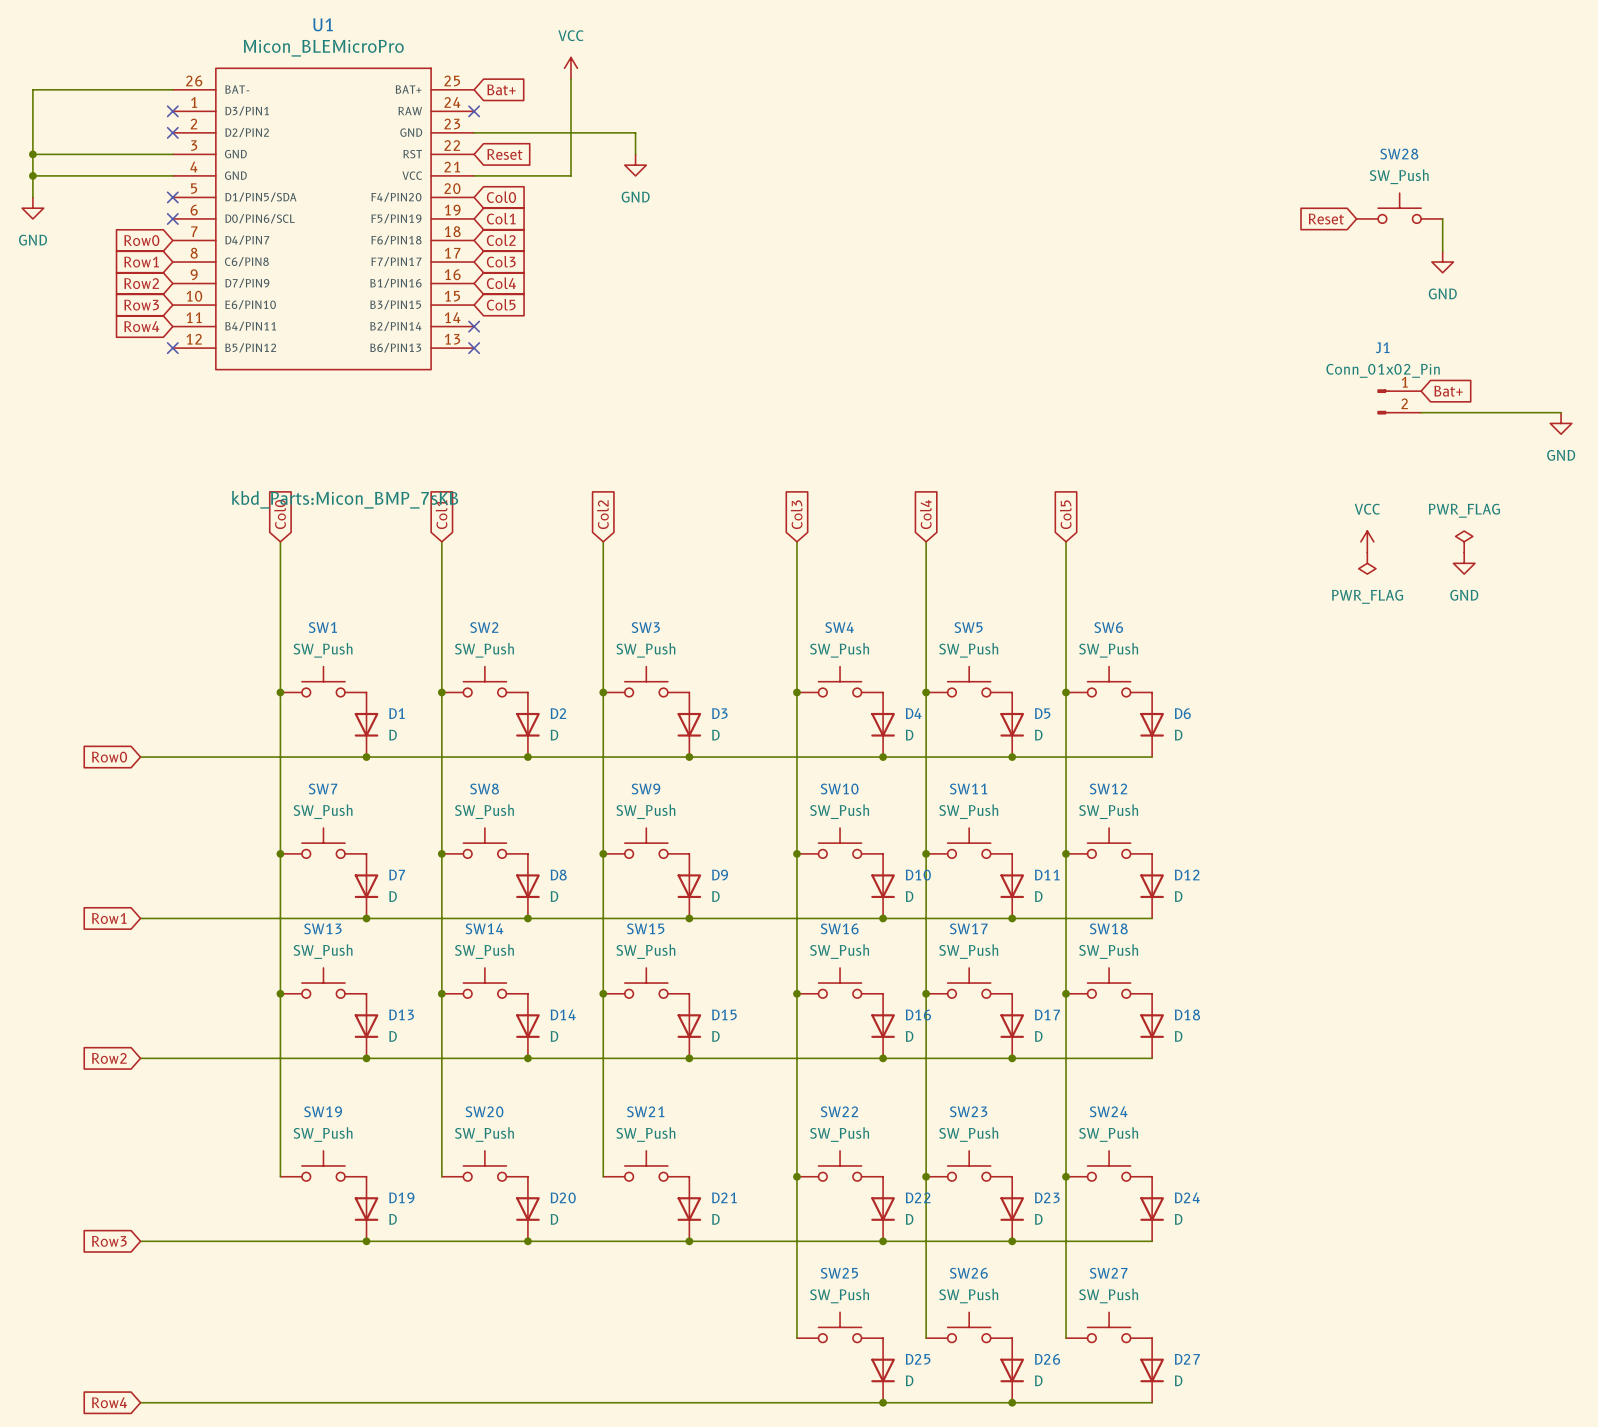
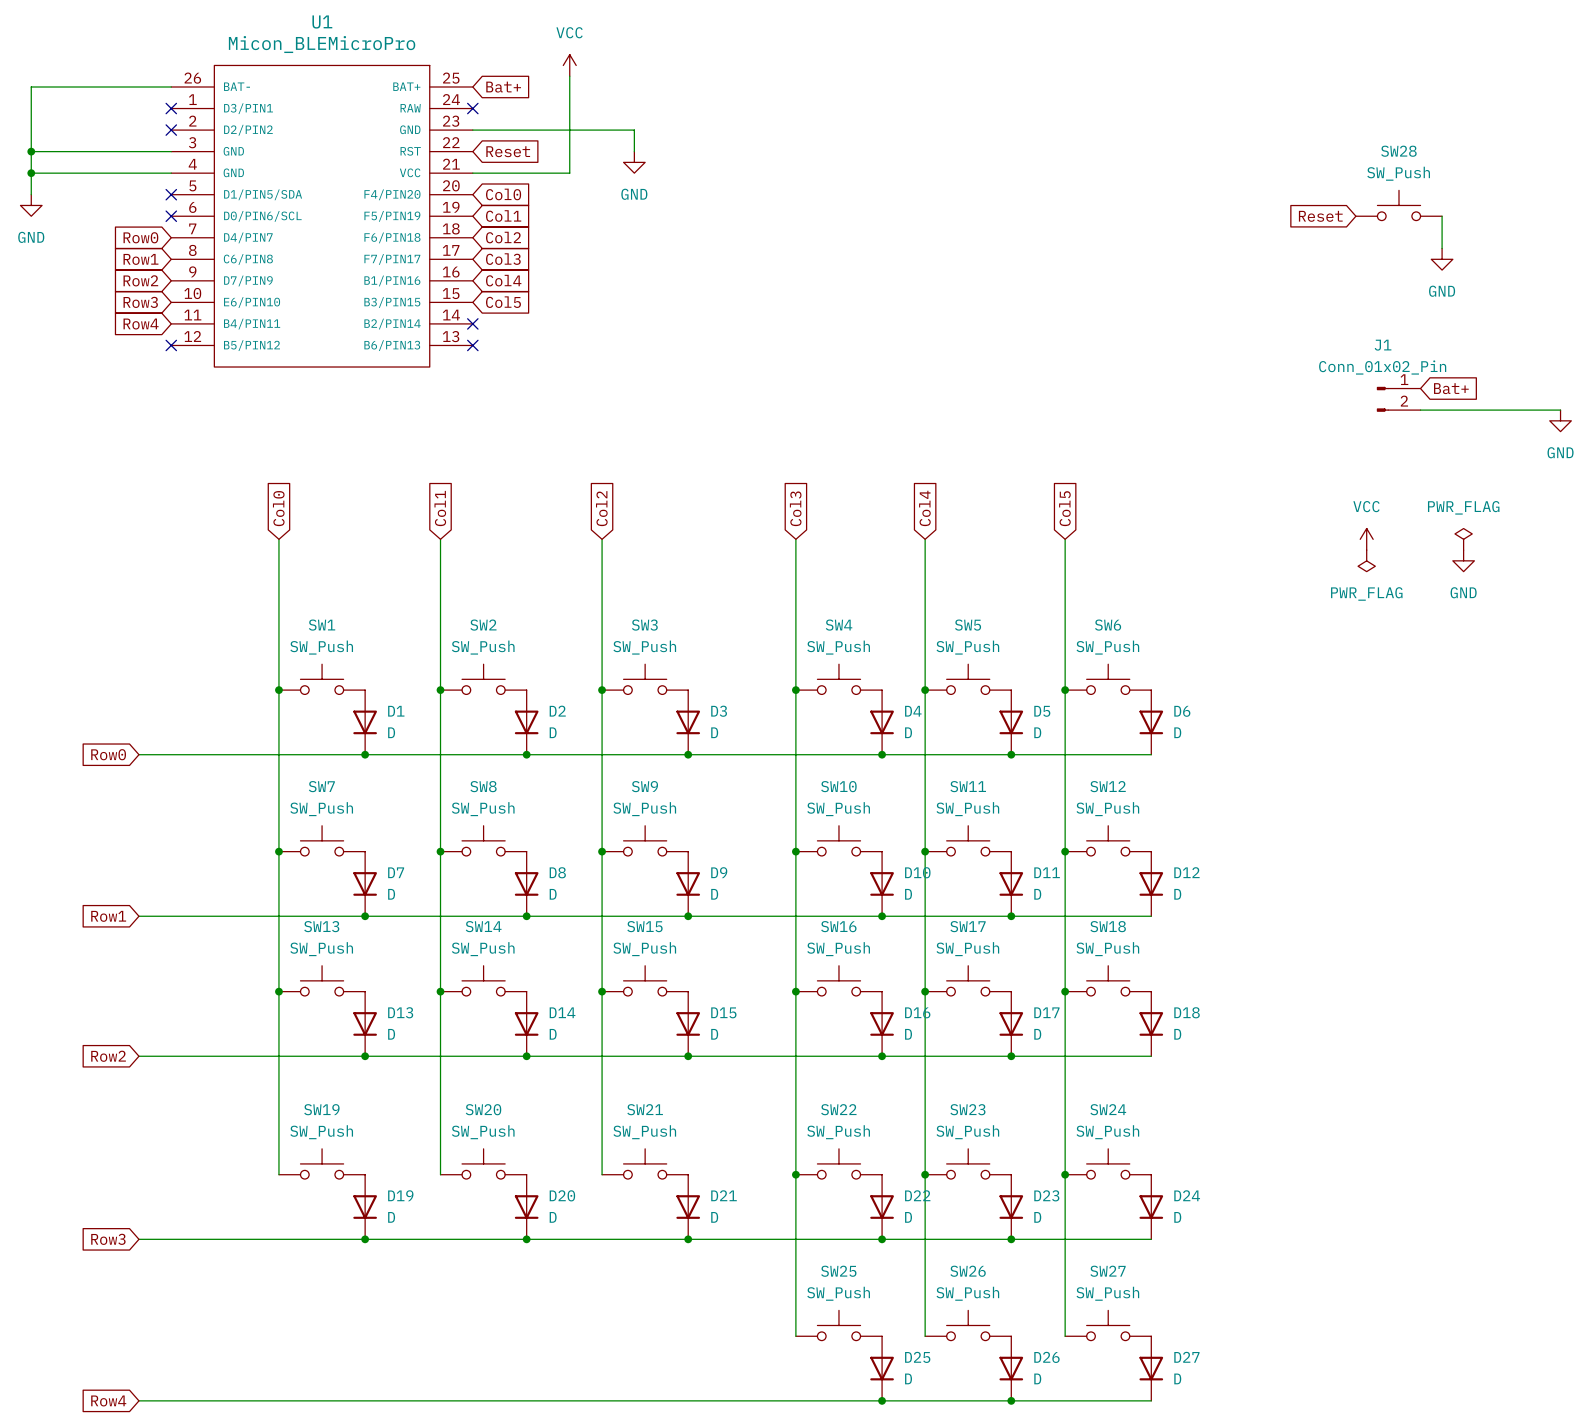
U1 text: kbd_Parts:Micon_BMP_7sKB (345, 499) -> none

